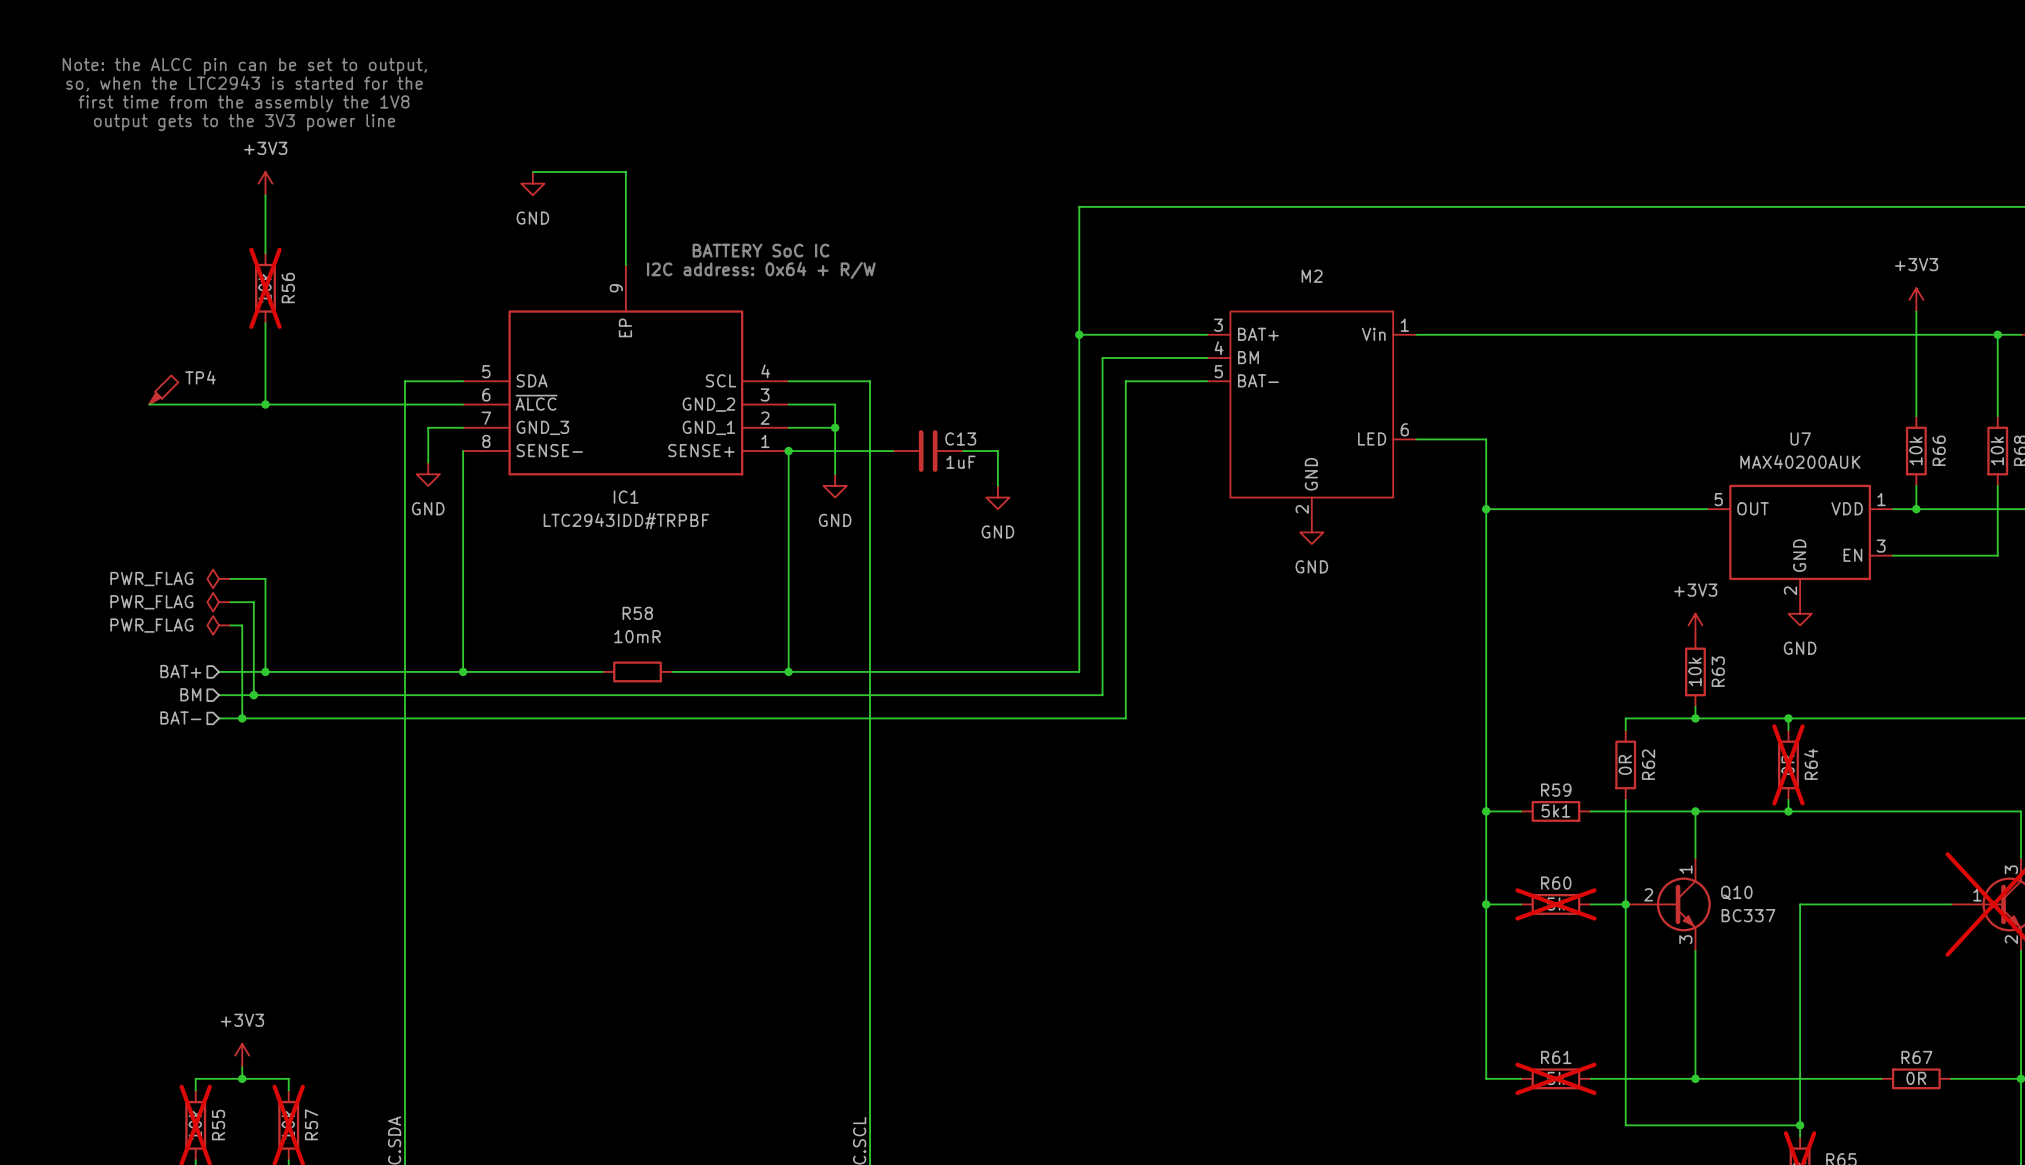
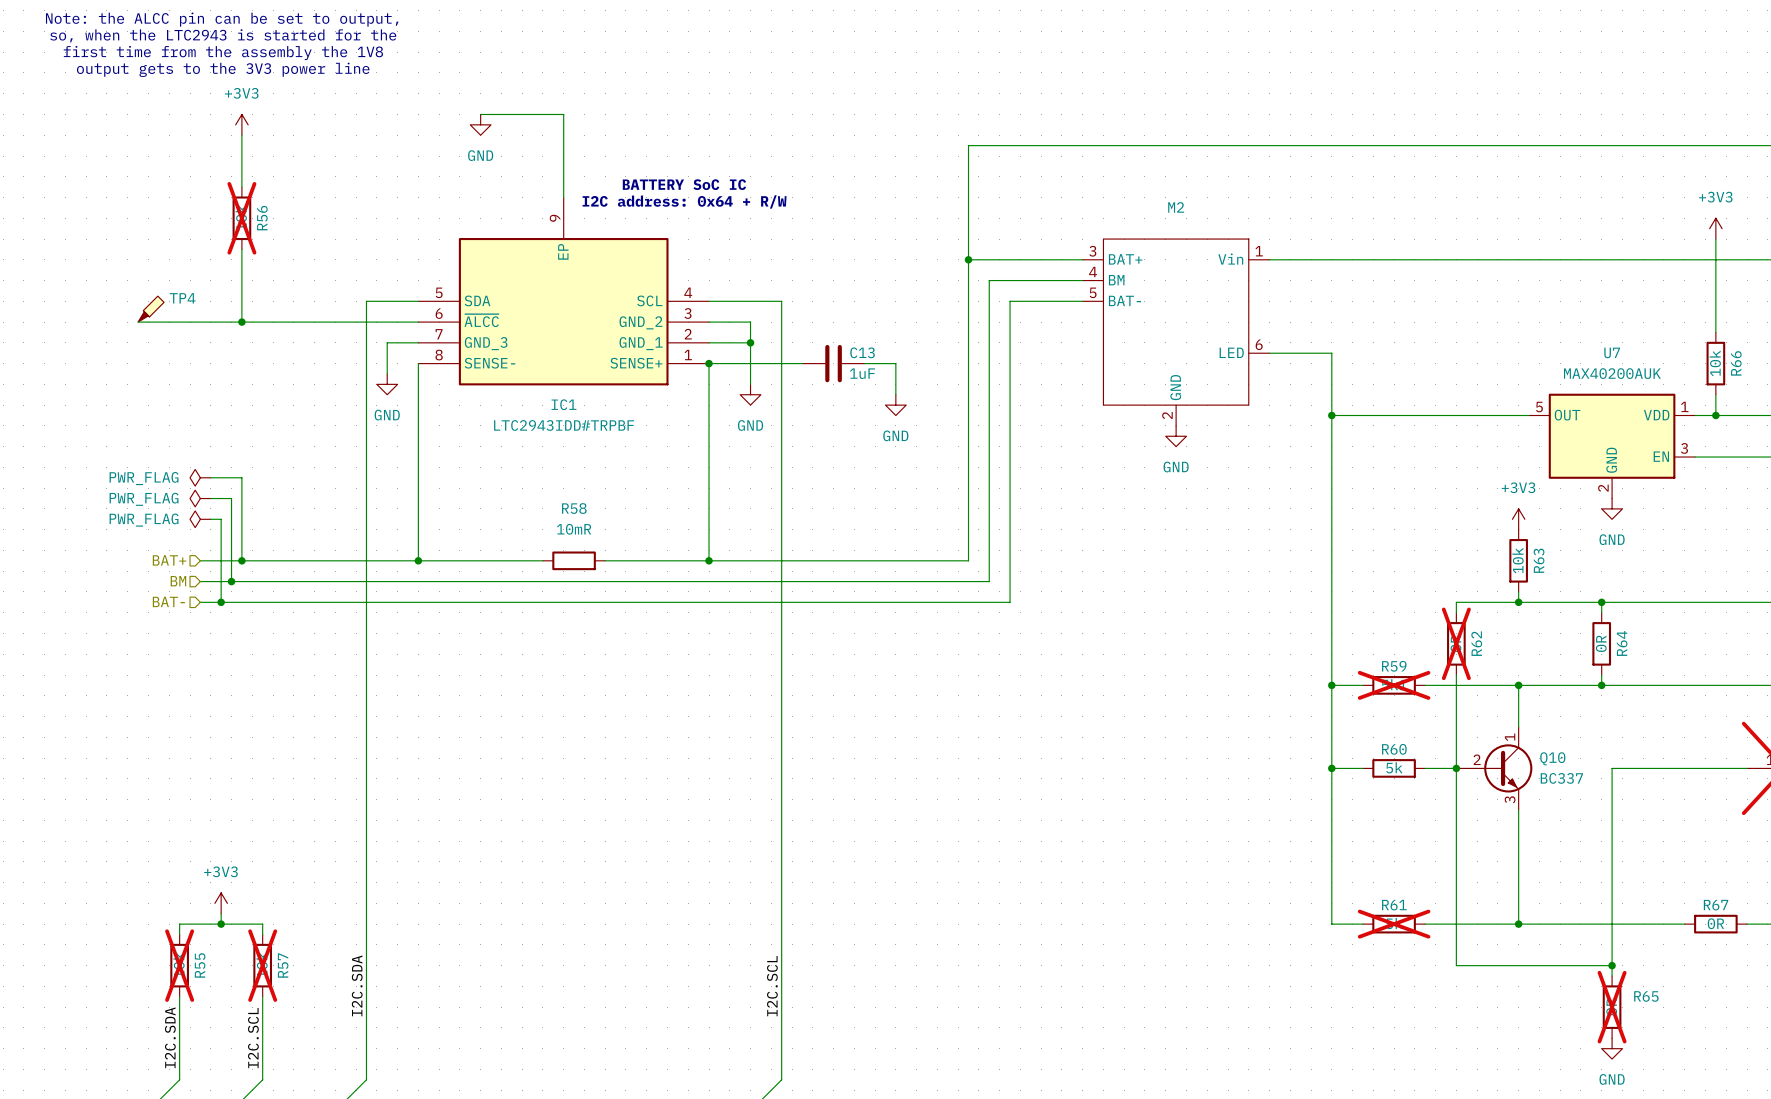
R62 do-not-place cross: none -> (1456, 643)
R64 do-not-place cross: (1788, 764) -> none
R59 do-not-place cross: none -> (1394, 685)
R60 do-not-place cross: (1555, 904) -> none

